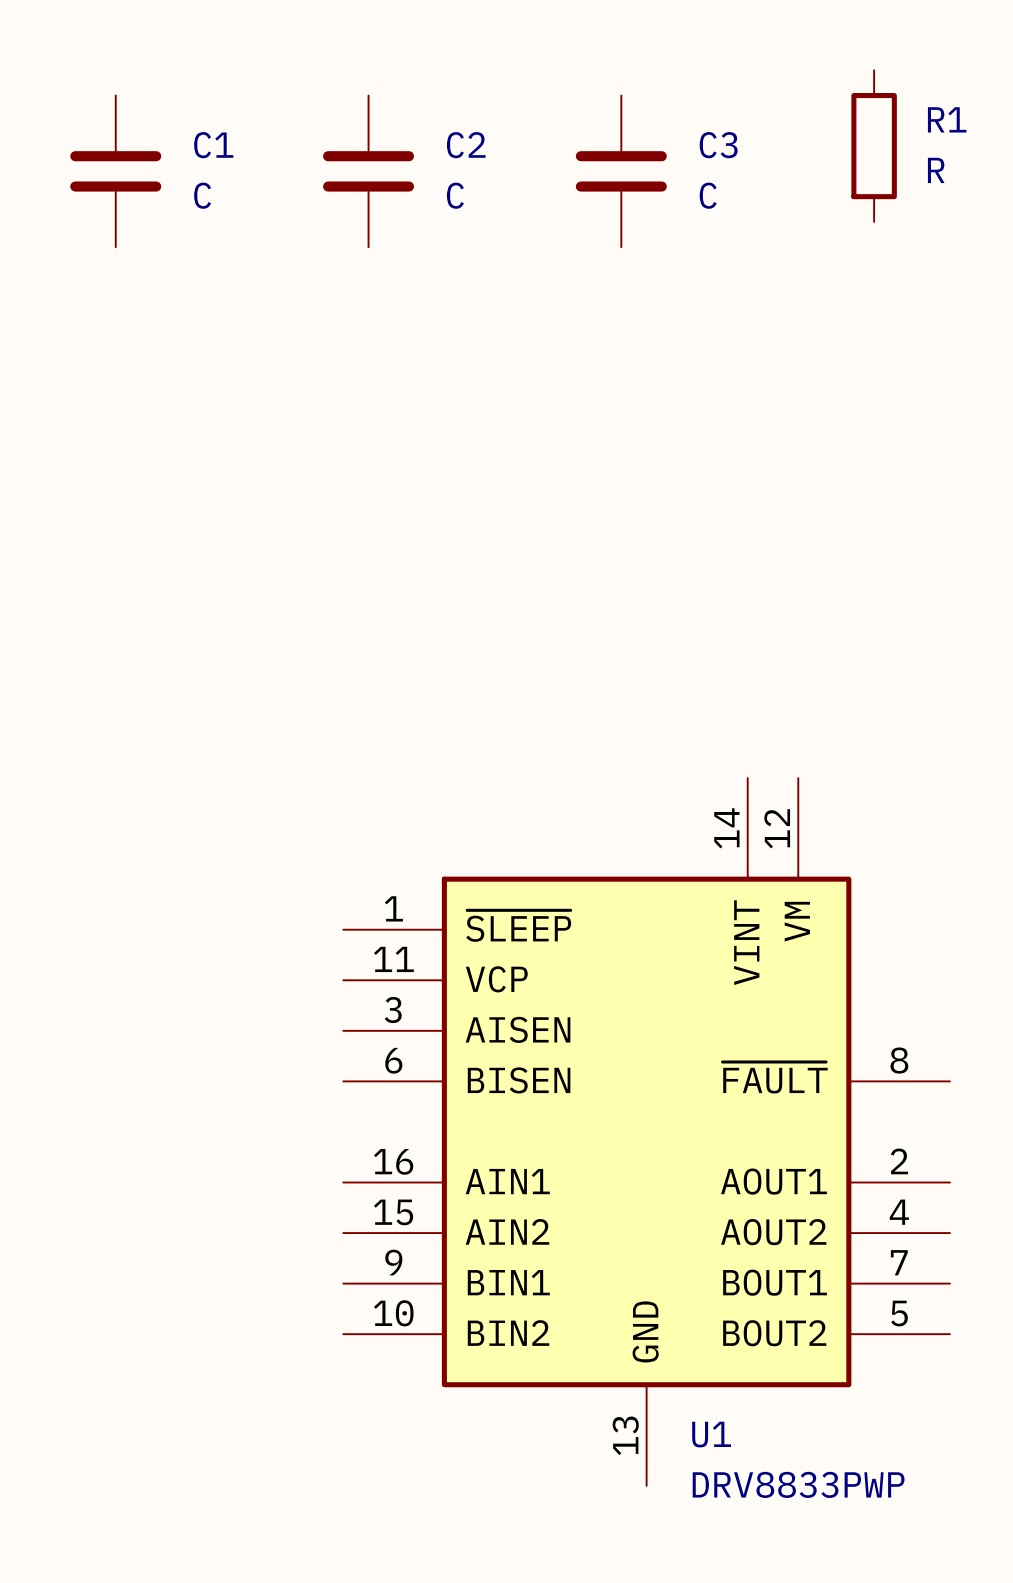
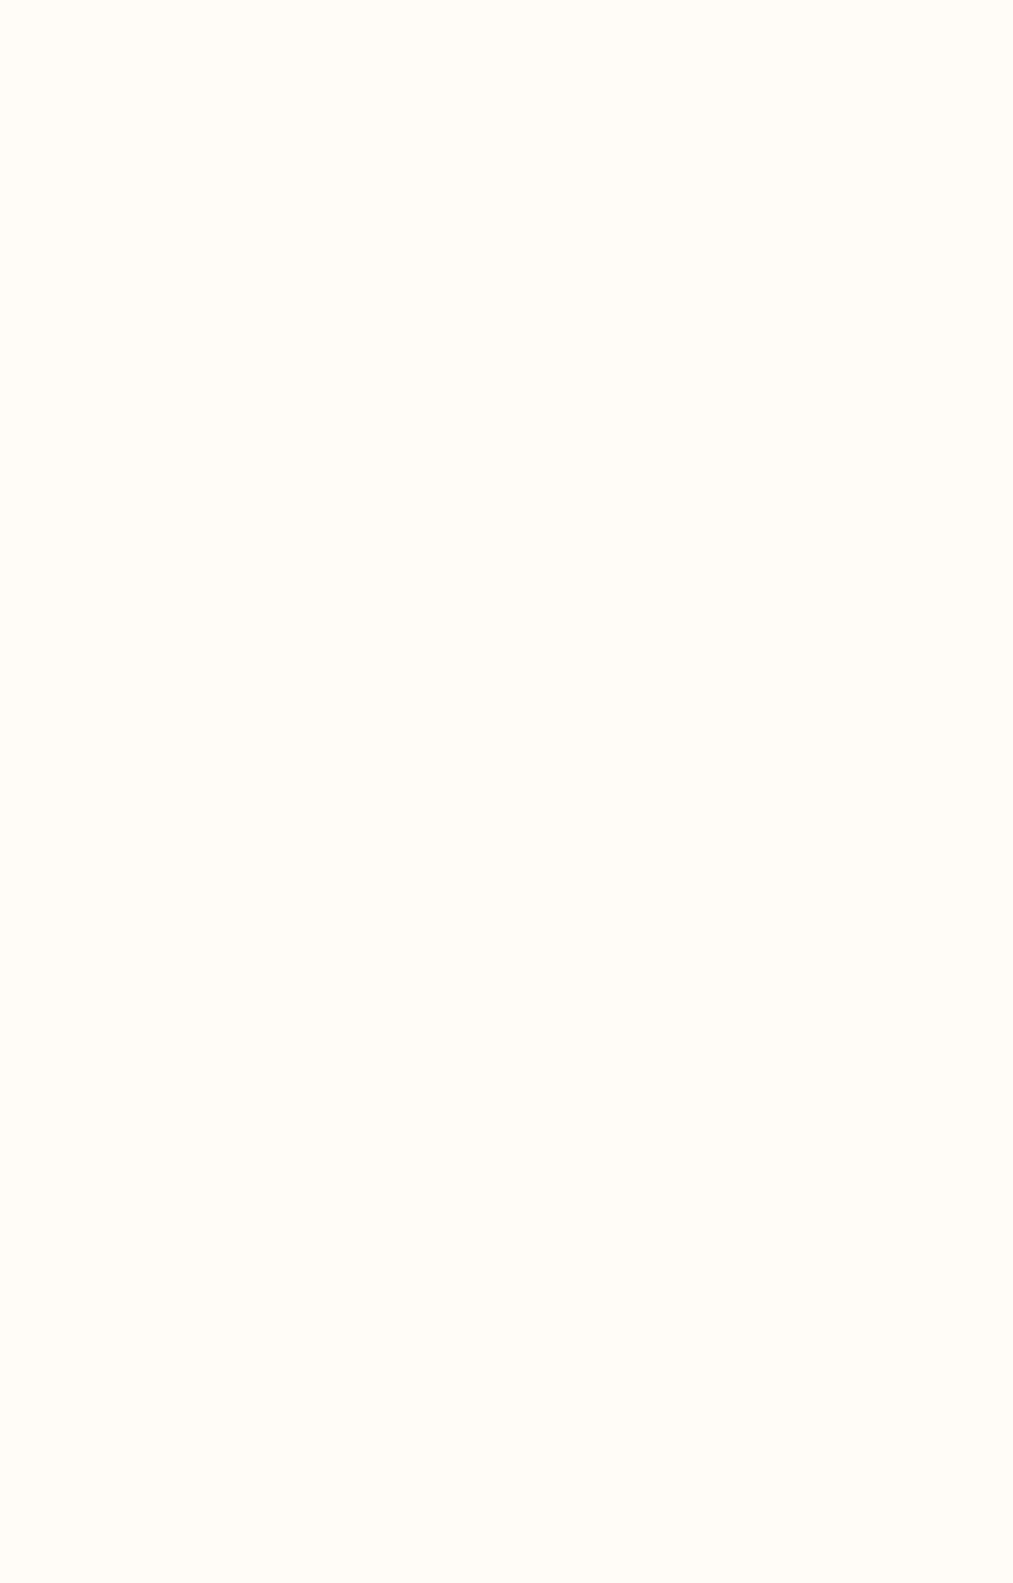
R1: R (874, 146) -> none
C1: C (115, 171) -> none
C2: C (368, 171) -> none
C3: C (621, 171) -> none
U1: DRV8833PWP (646, 1131) -> none

